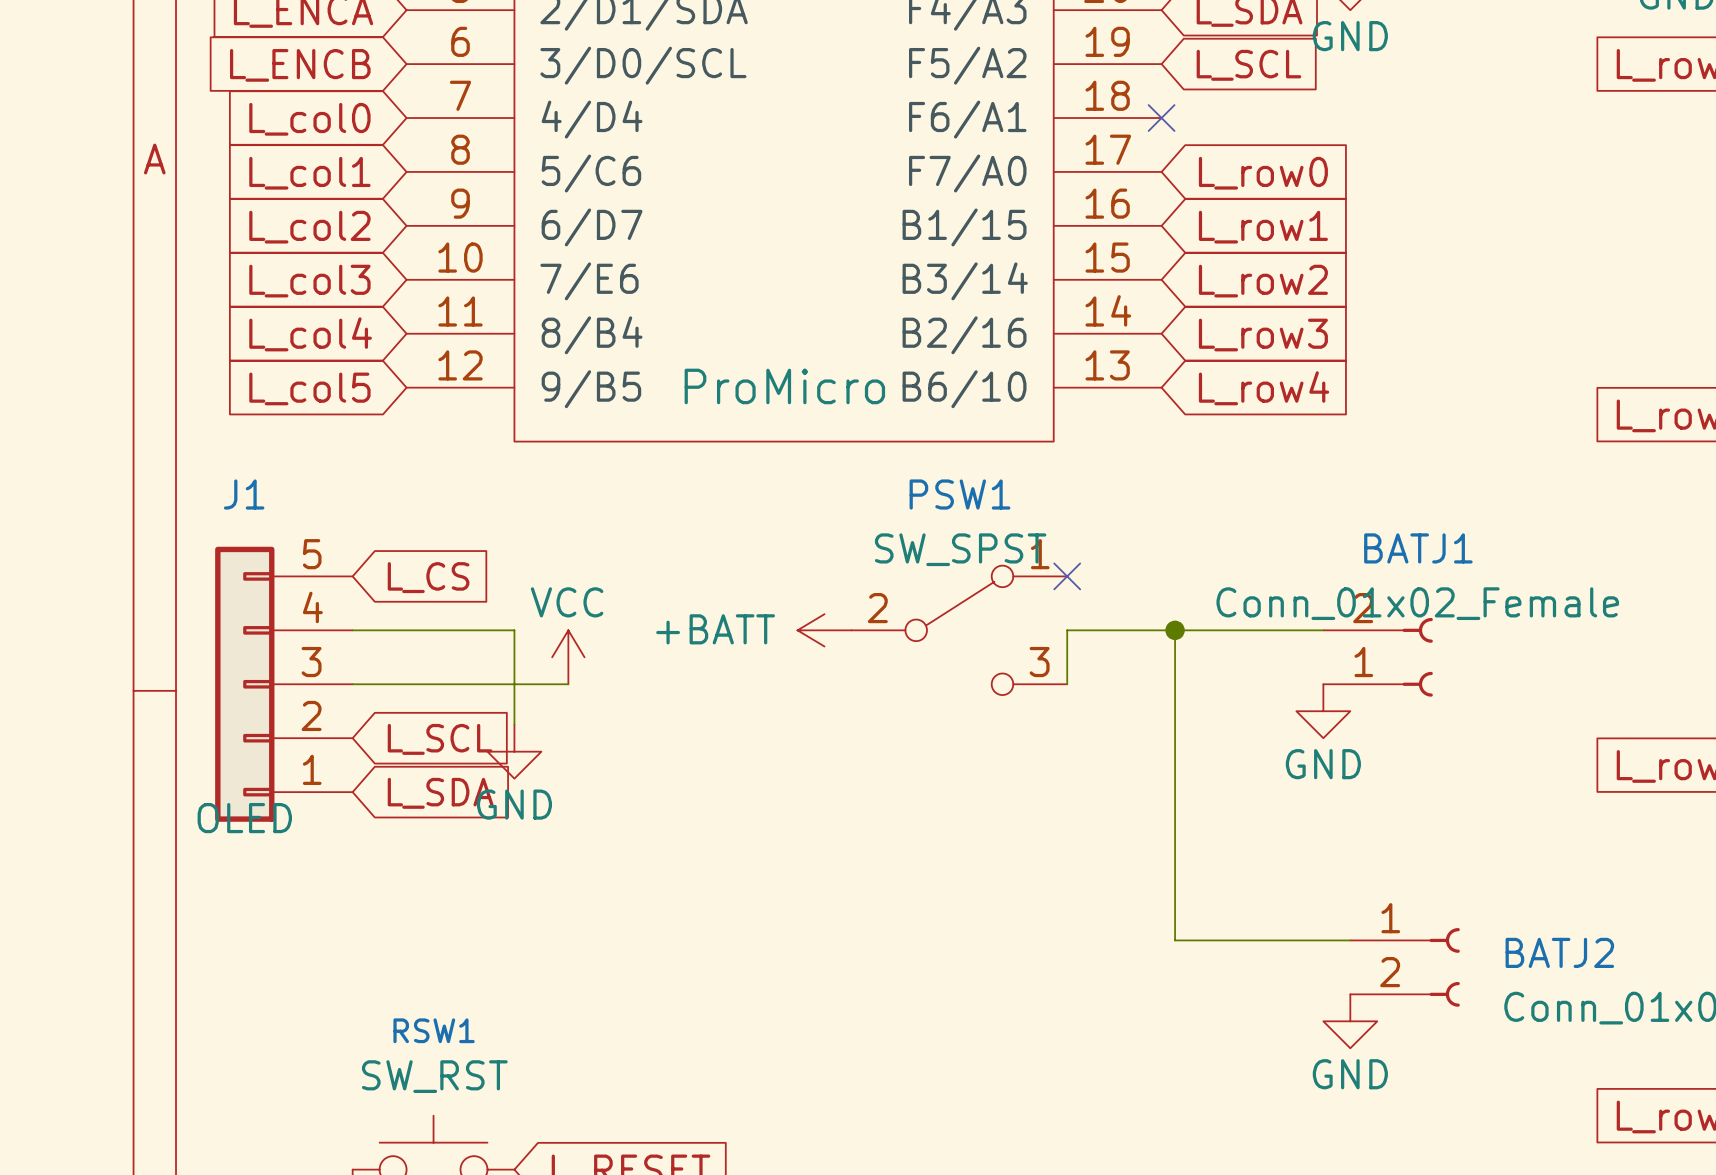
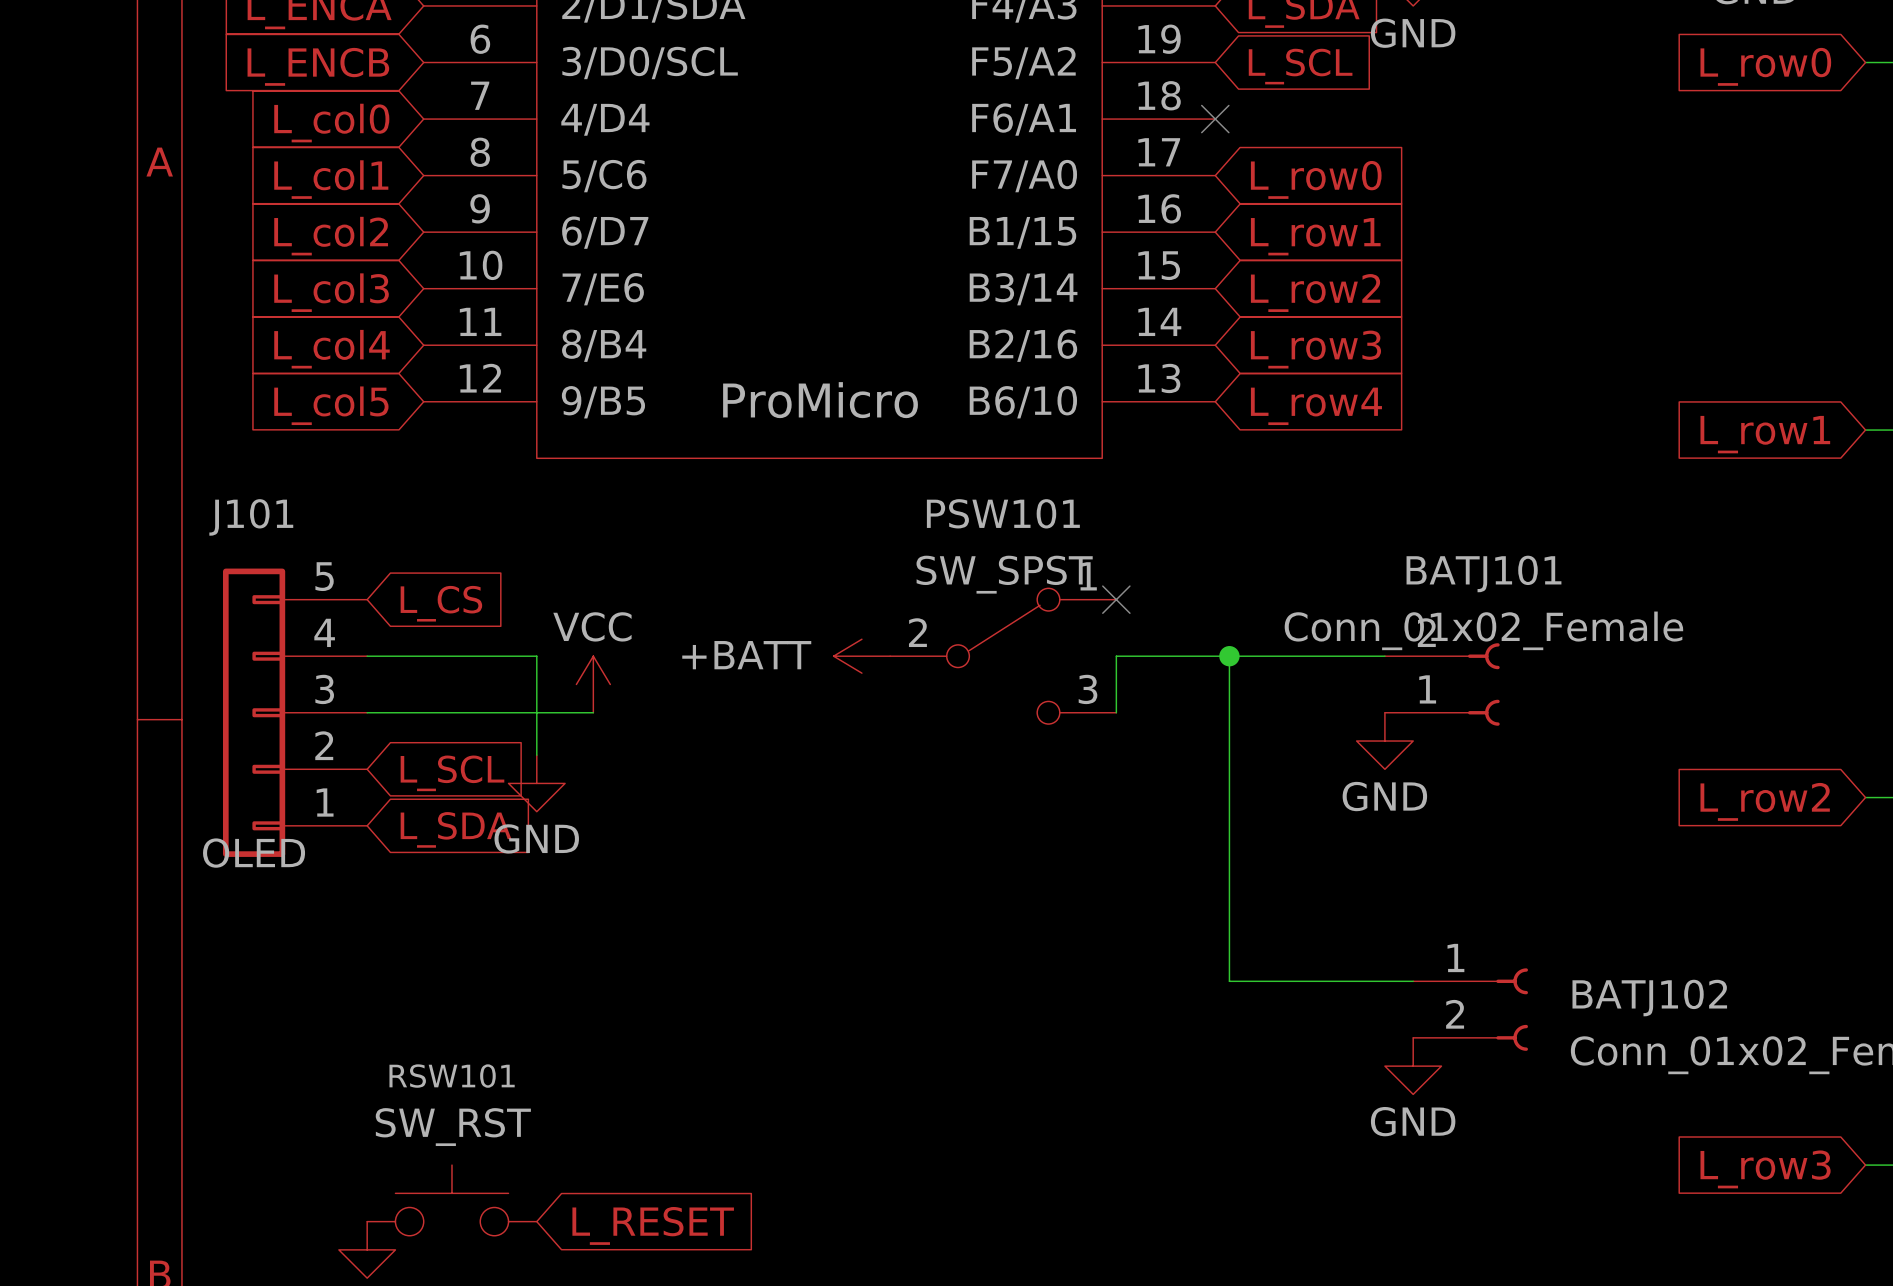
J1 name: J1 (244, 494) -> J101 (251, 517)
PSW1 name: PSW1 (959, 494) -> PSW101 (1003, 513)
BATJ1 name: BATJ1 (1418, 548) -> BATJ101 (1483, 573)
BATJ2 name: BATJ2 (1559, 952) -> BATJ102 (1649, 998)
RSW1 name: RSW1 (434, 1030) -> RSW101 (452, 1076)

